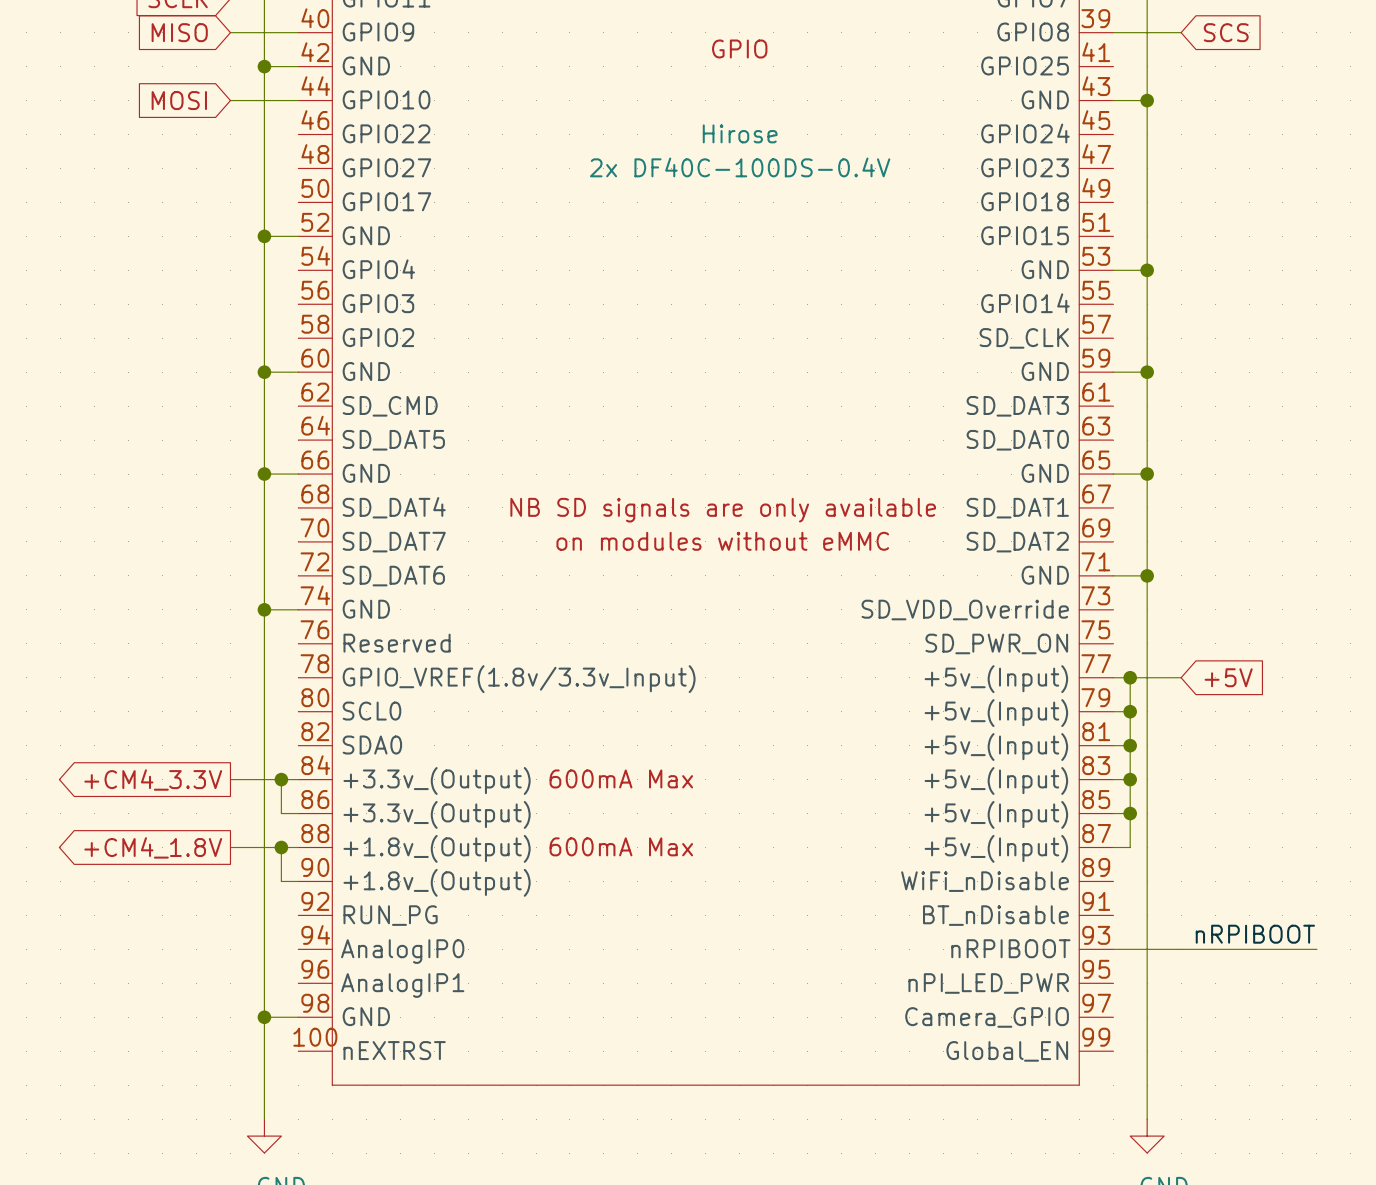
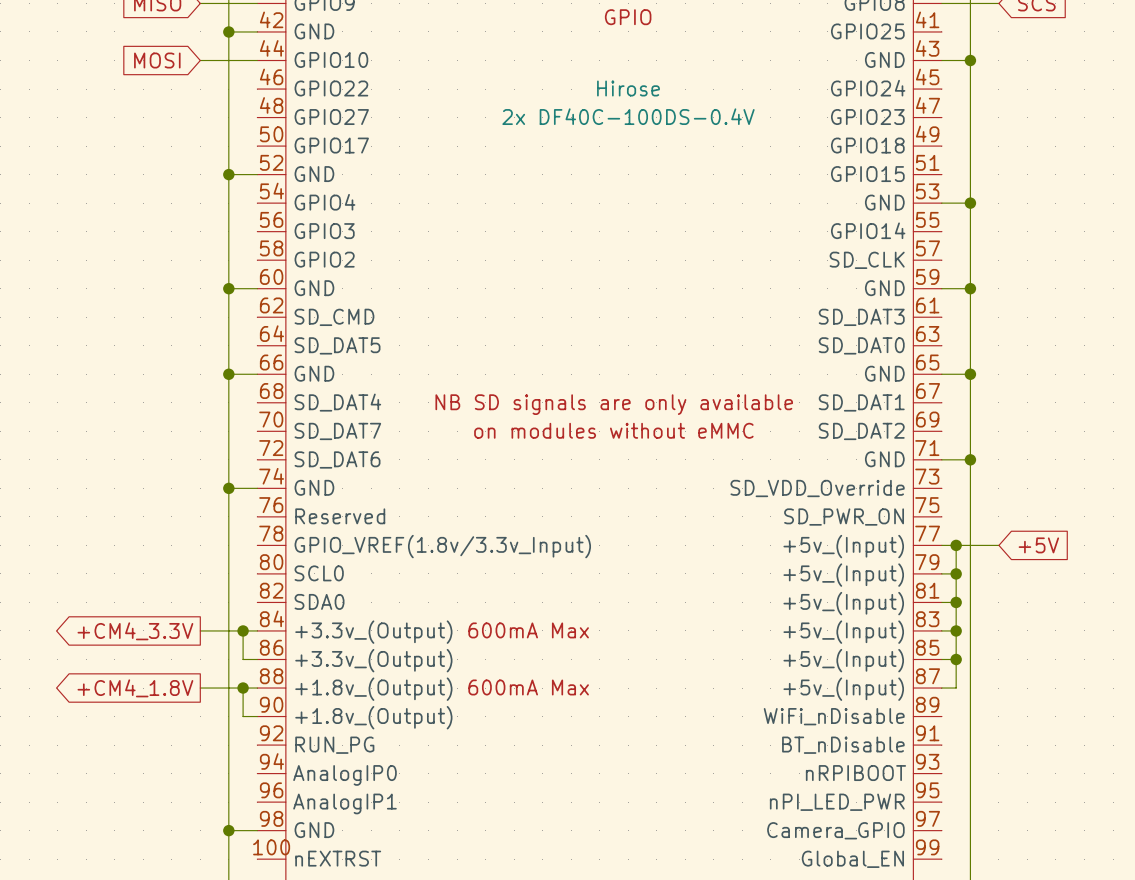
label: nRPIBOOT (1255, 934) -> none
wire: (1113, 949) (1316, 949) -> none

